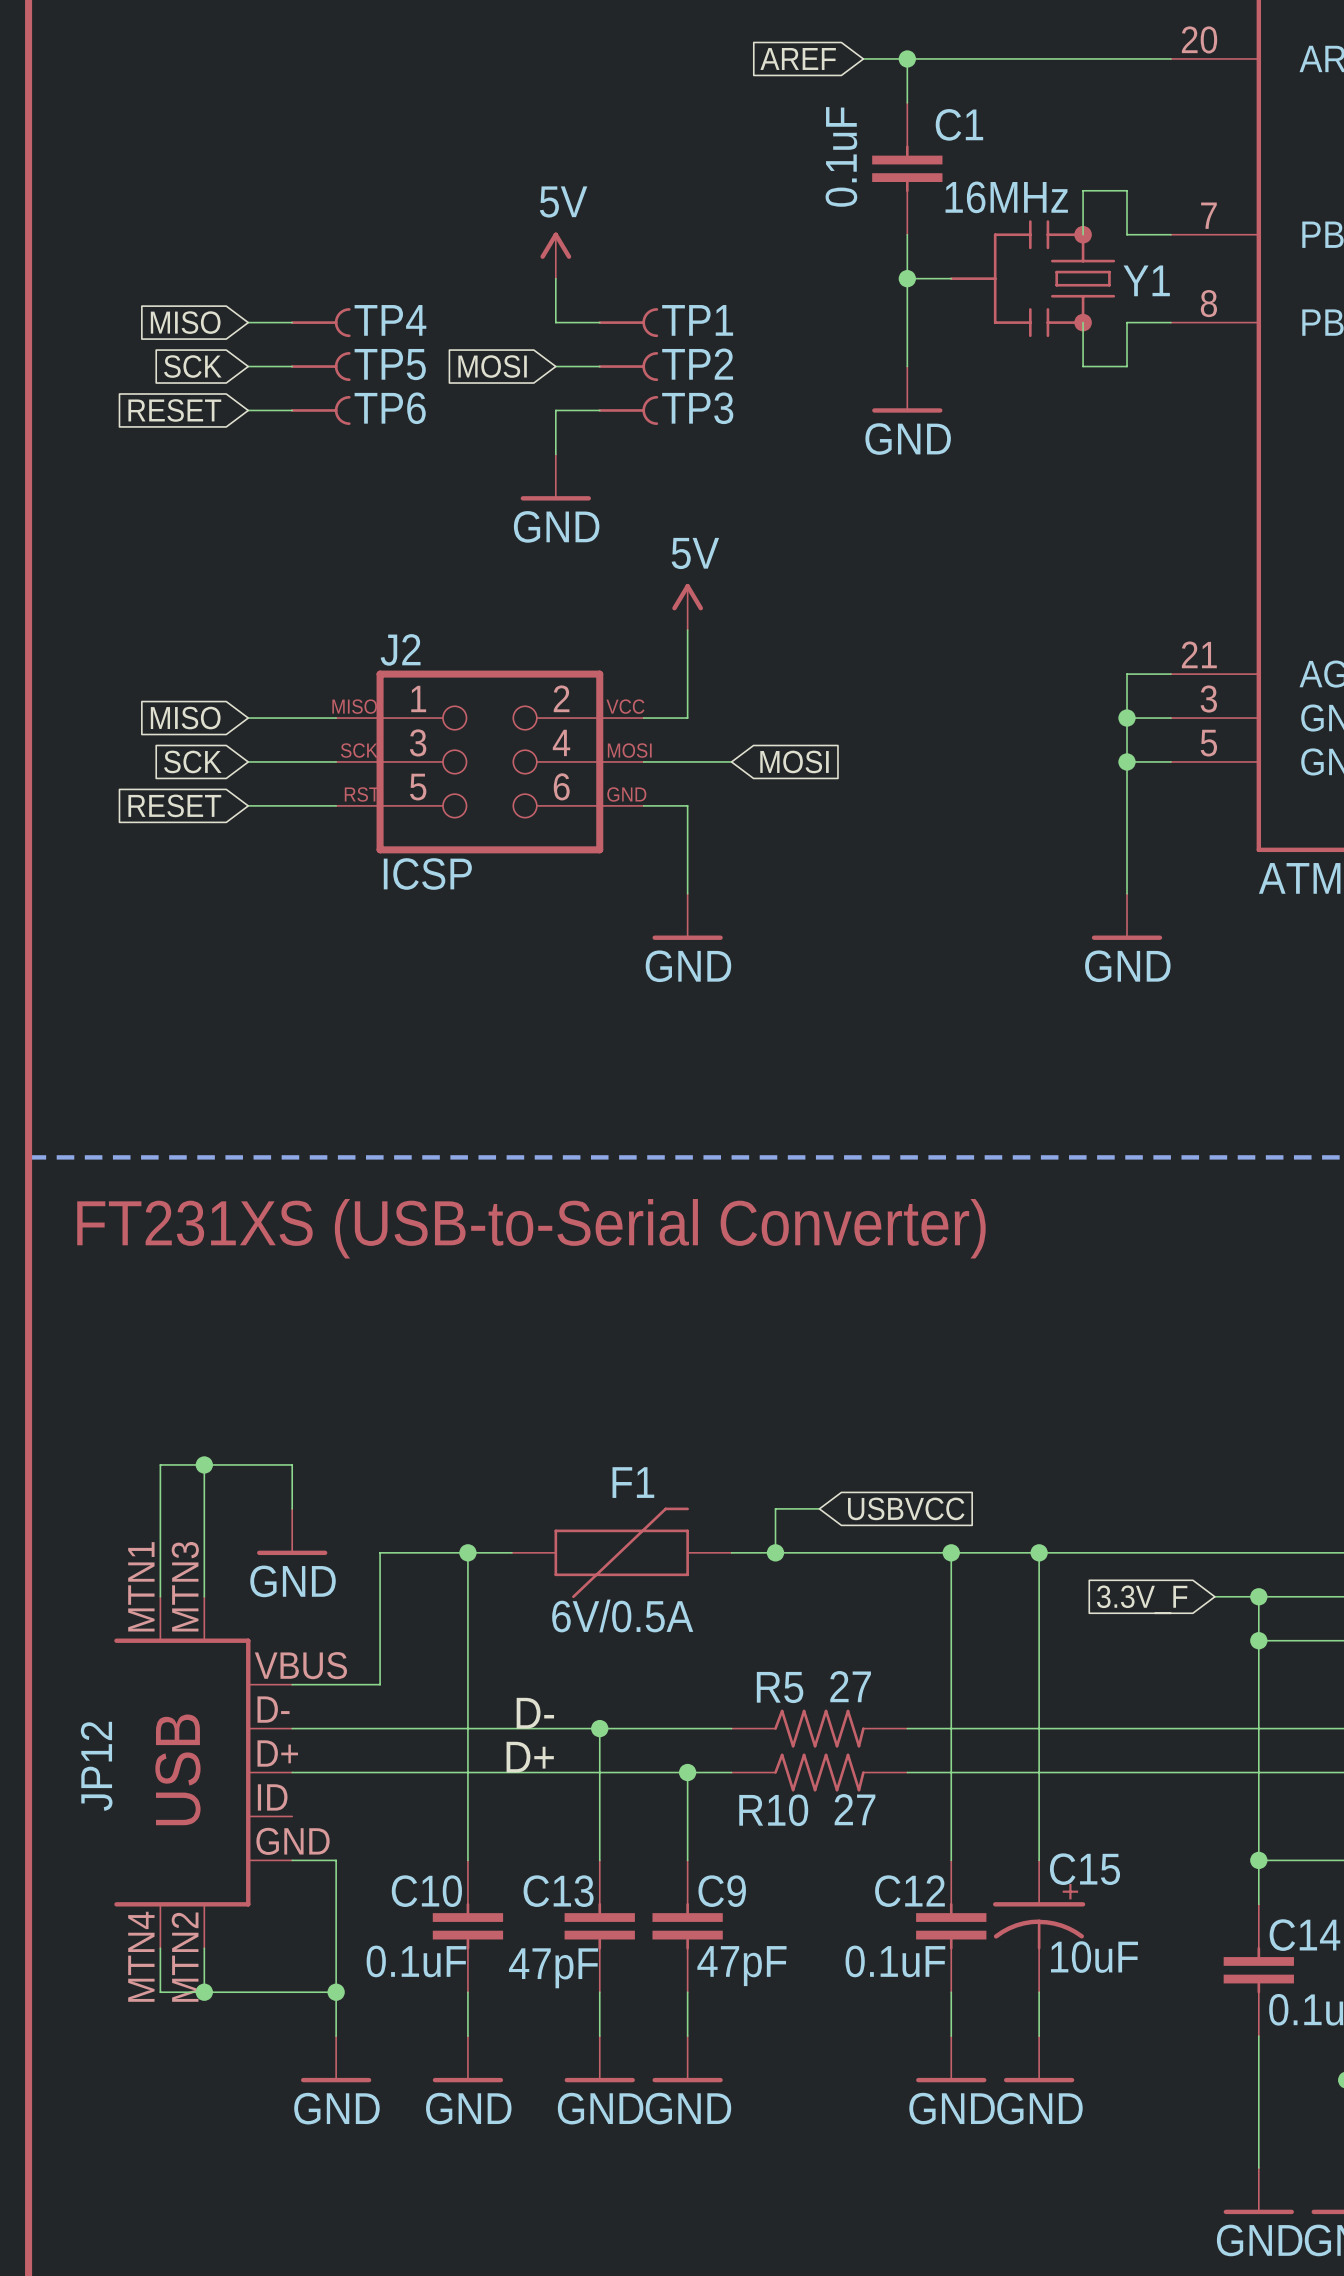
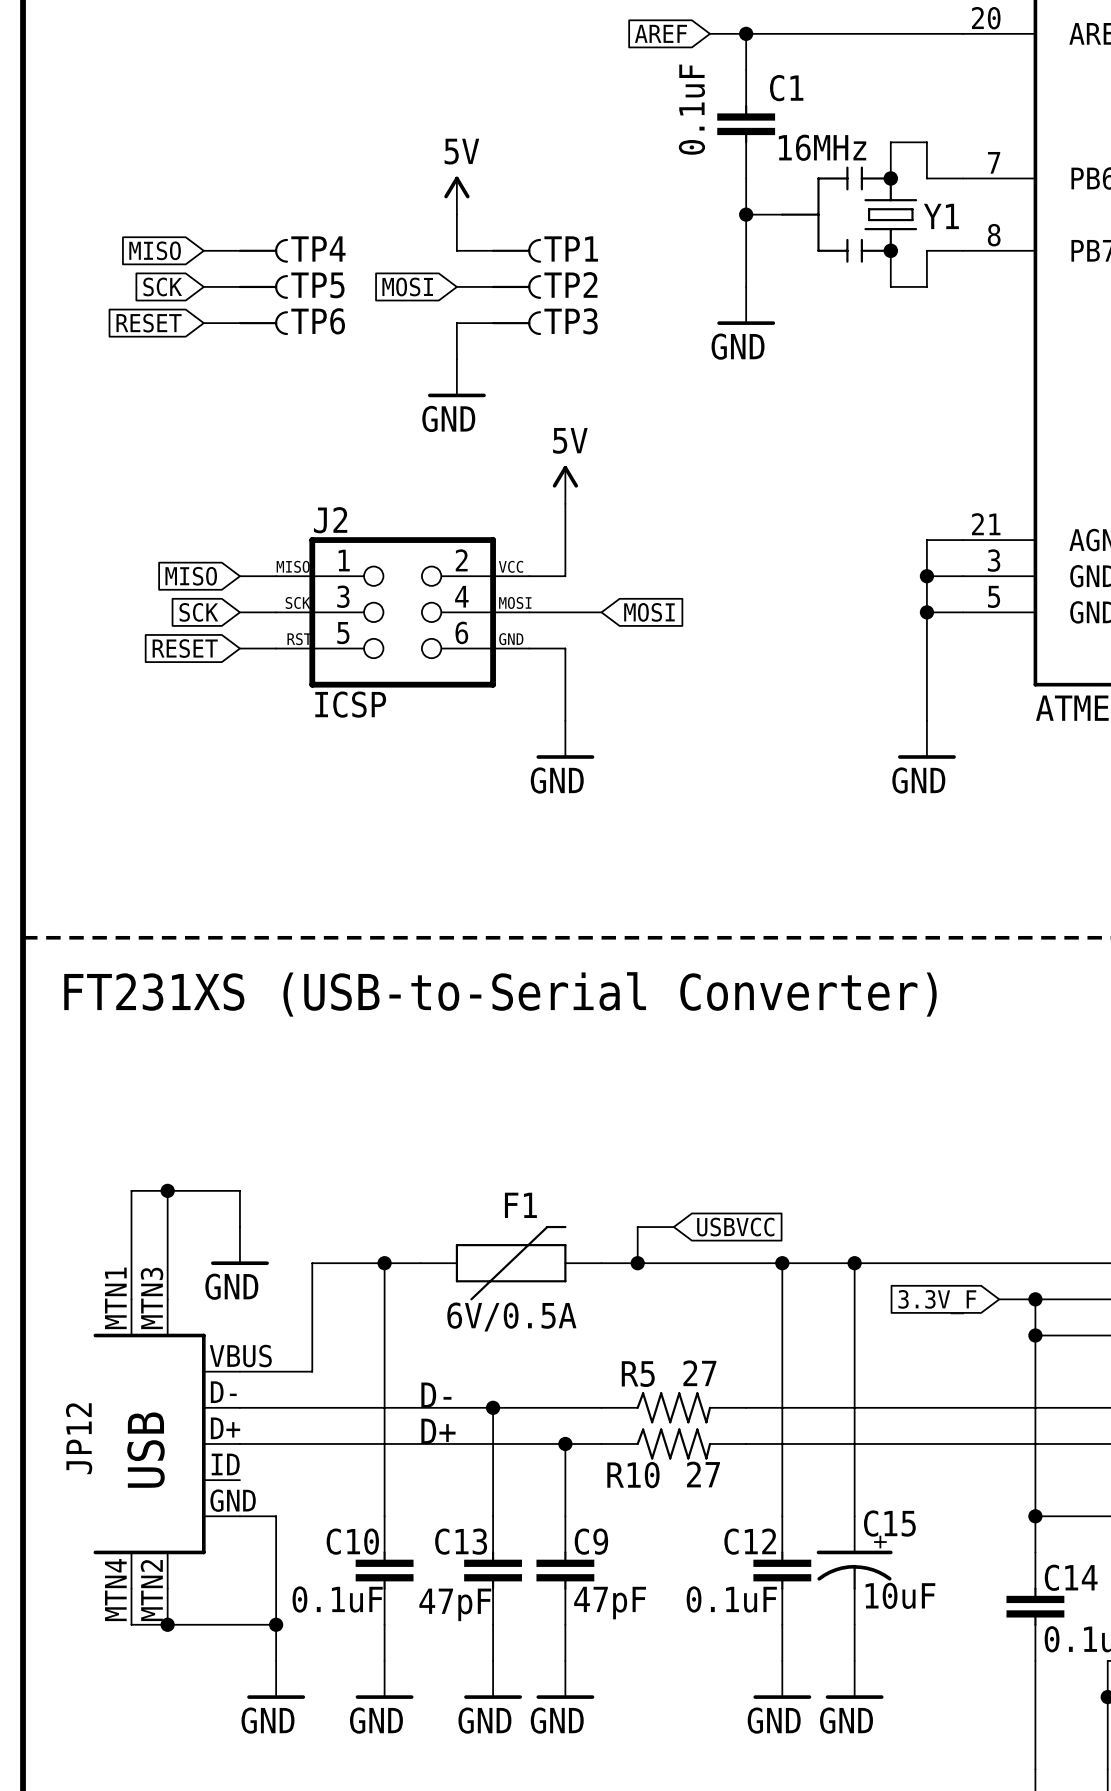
global label position: MISO (185, 718) -> MISO (191, 576)
wire: (248, 718) (292, 718) -> none
global label position: SCK (192, 761) -> SCK (198, 612)
wire: (248, 761) (292, 761) -> none
global label position: RESET (174, 805) -> RESET (185, 648)
wire: (248, 805) (292, 805) -> none

